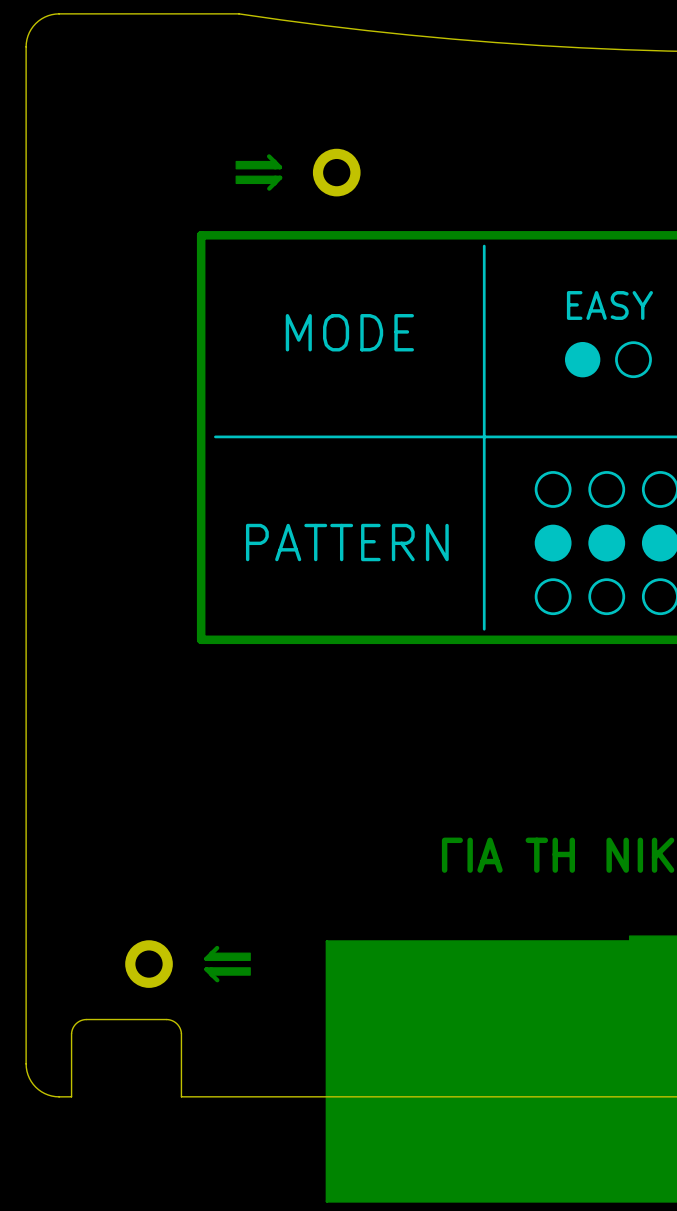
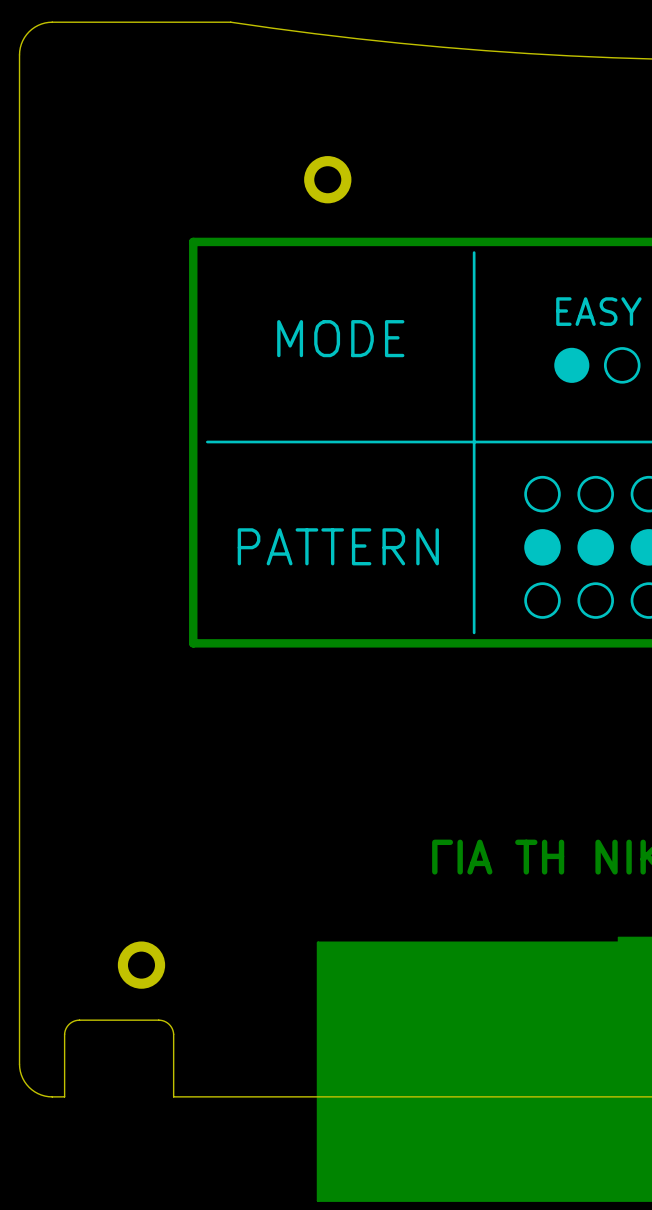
track: (269, 156) (279, 167) (274, 167) -> none
drawing: [235, 160, 277, 185] -> none
track: (275, 177) (280, 177) (269, 188) -> none
track: (217, 947) (206, 958) (211, 958) -> none
drawing: [209, 952, 251, 976] -> none
track: (211, 969) (206, 969) (217, 980) -> none

